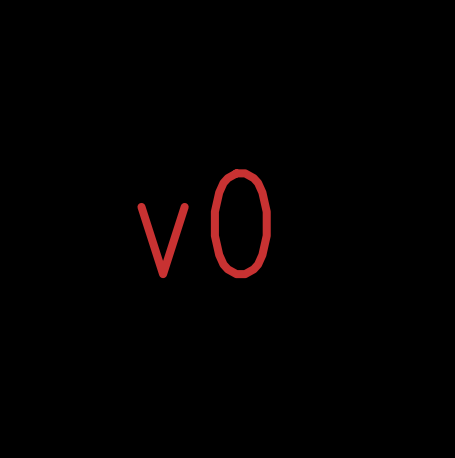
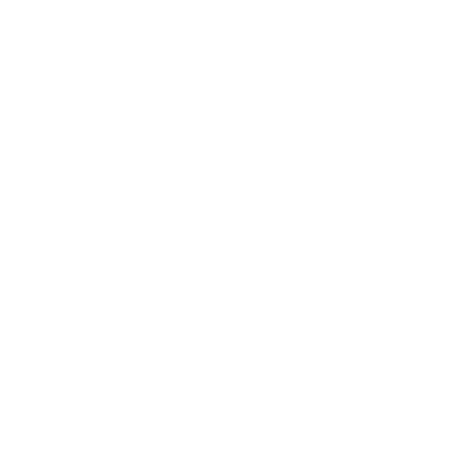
text: v0 (204, 223) -> none

